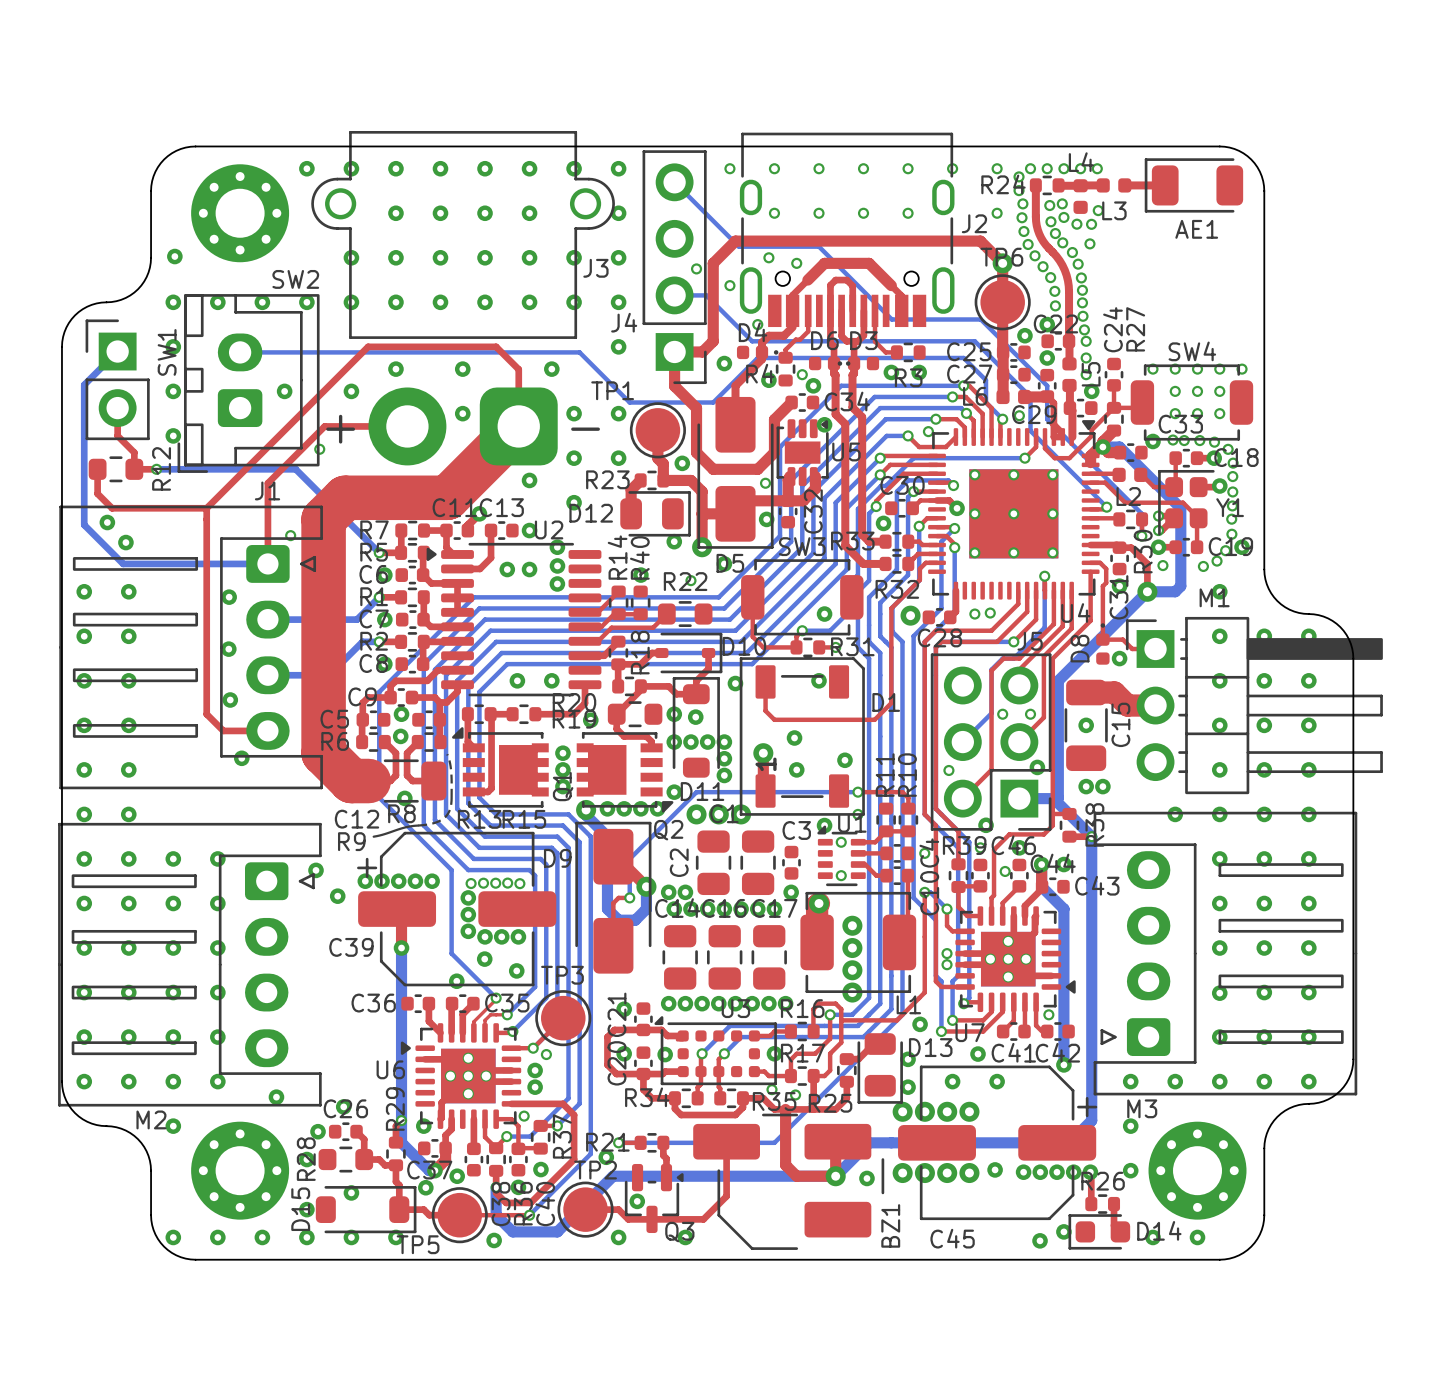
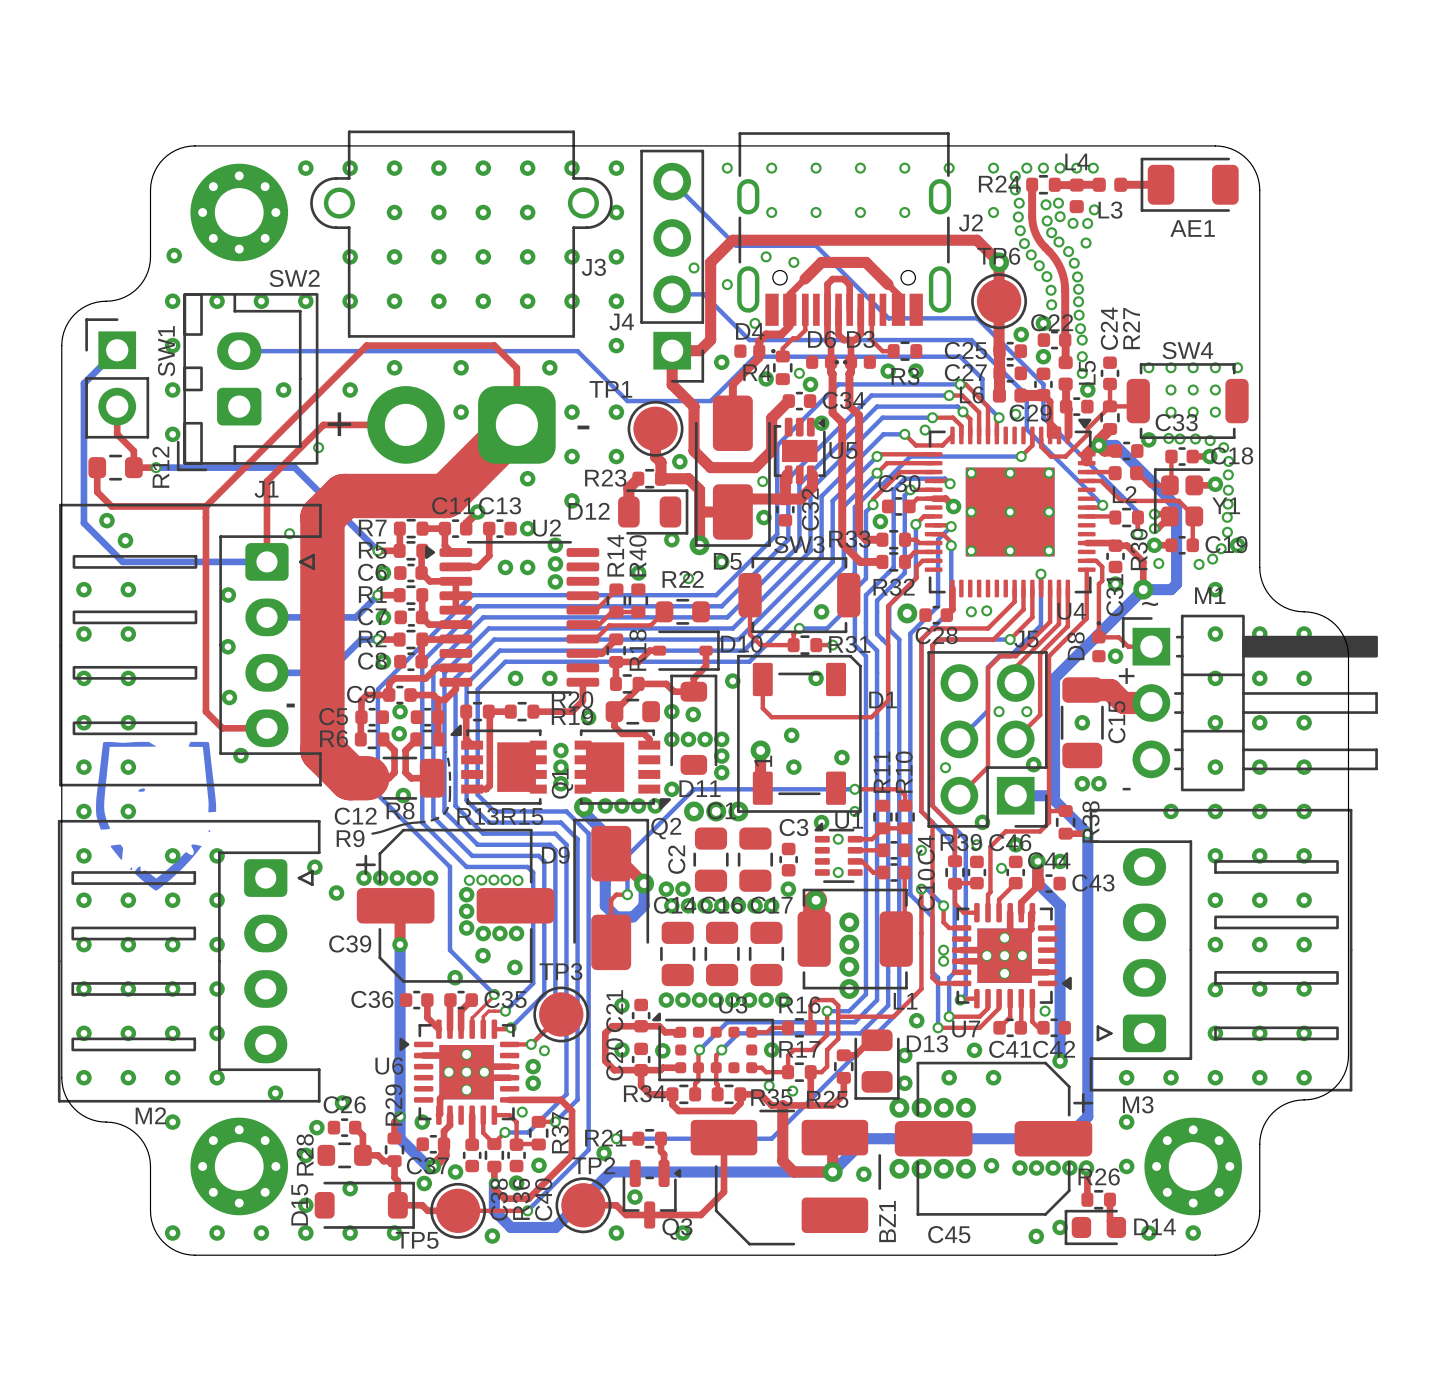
text: none -> ~ (1150, 603)
text: none -> + (1126, 676)
text: none -> - (290, 705)
drawing: none -> [95, 741, 217, 891]
text: none -> - (1126, 789)
via: (128, 858) -> none

